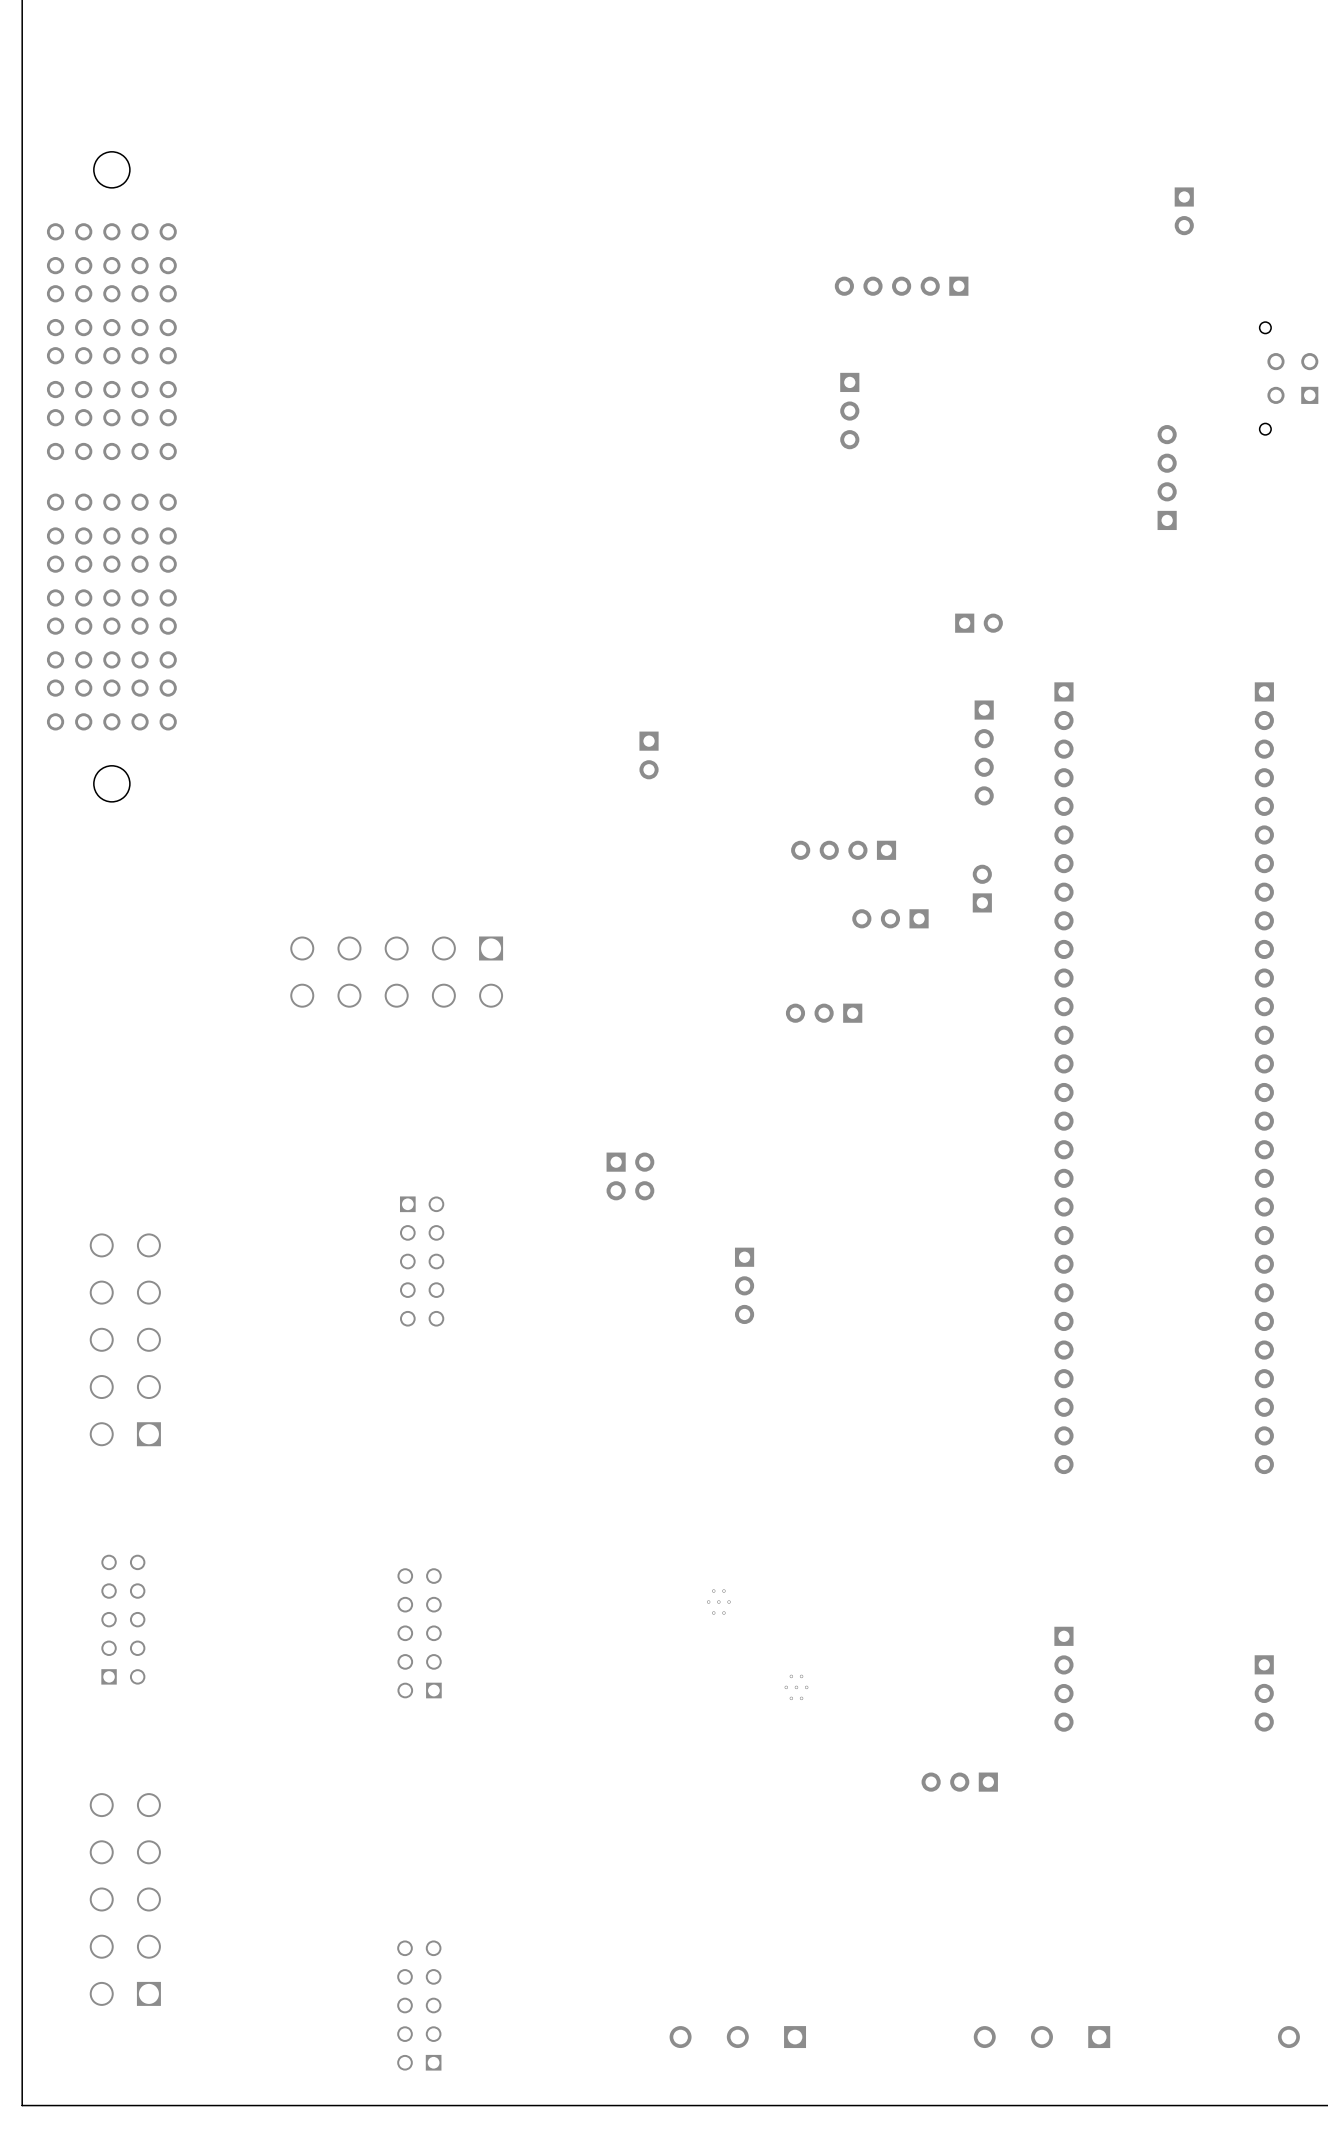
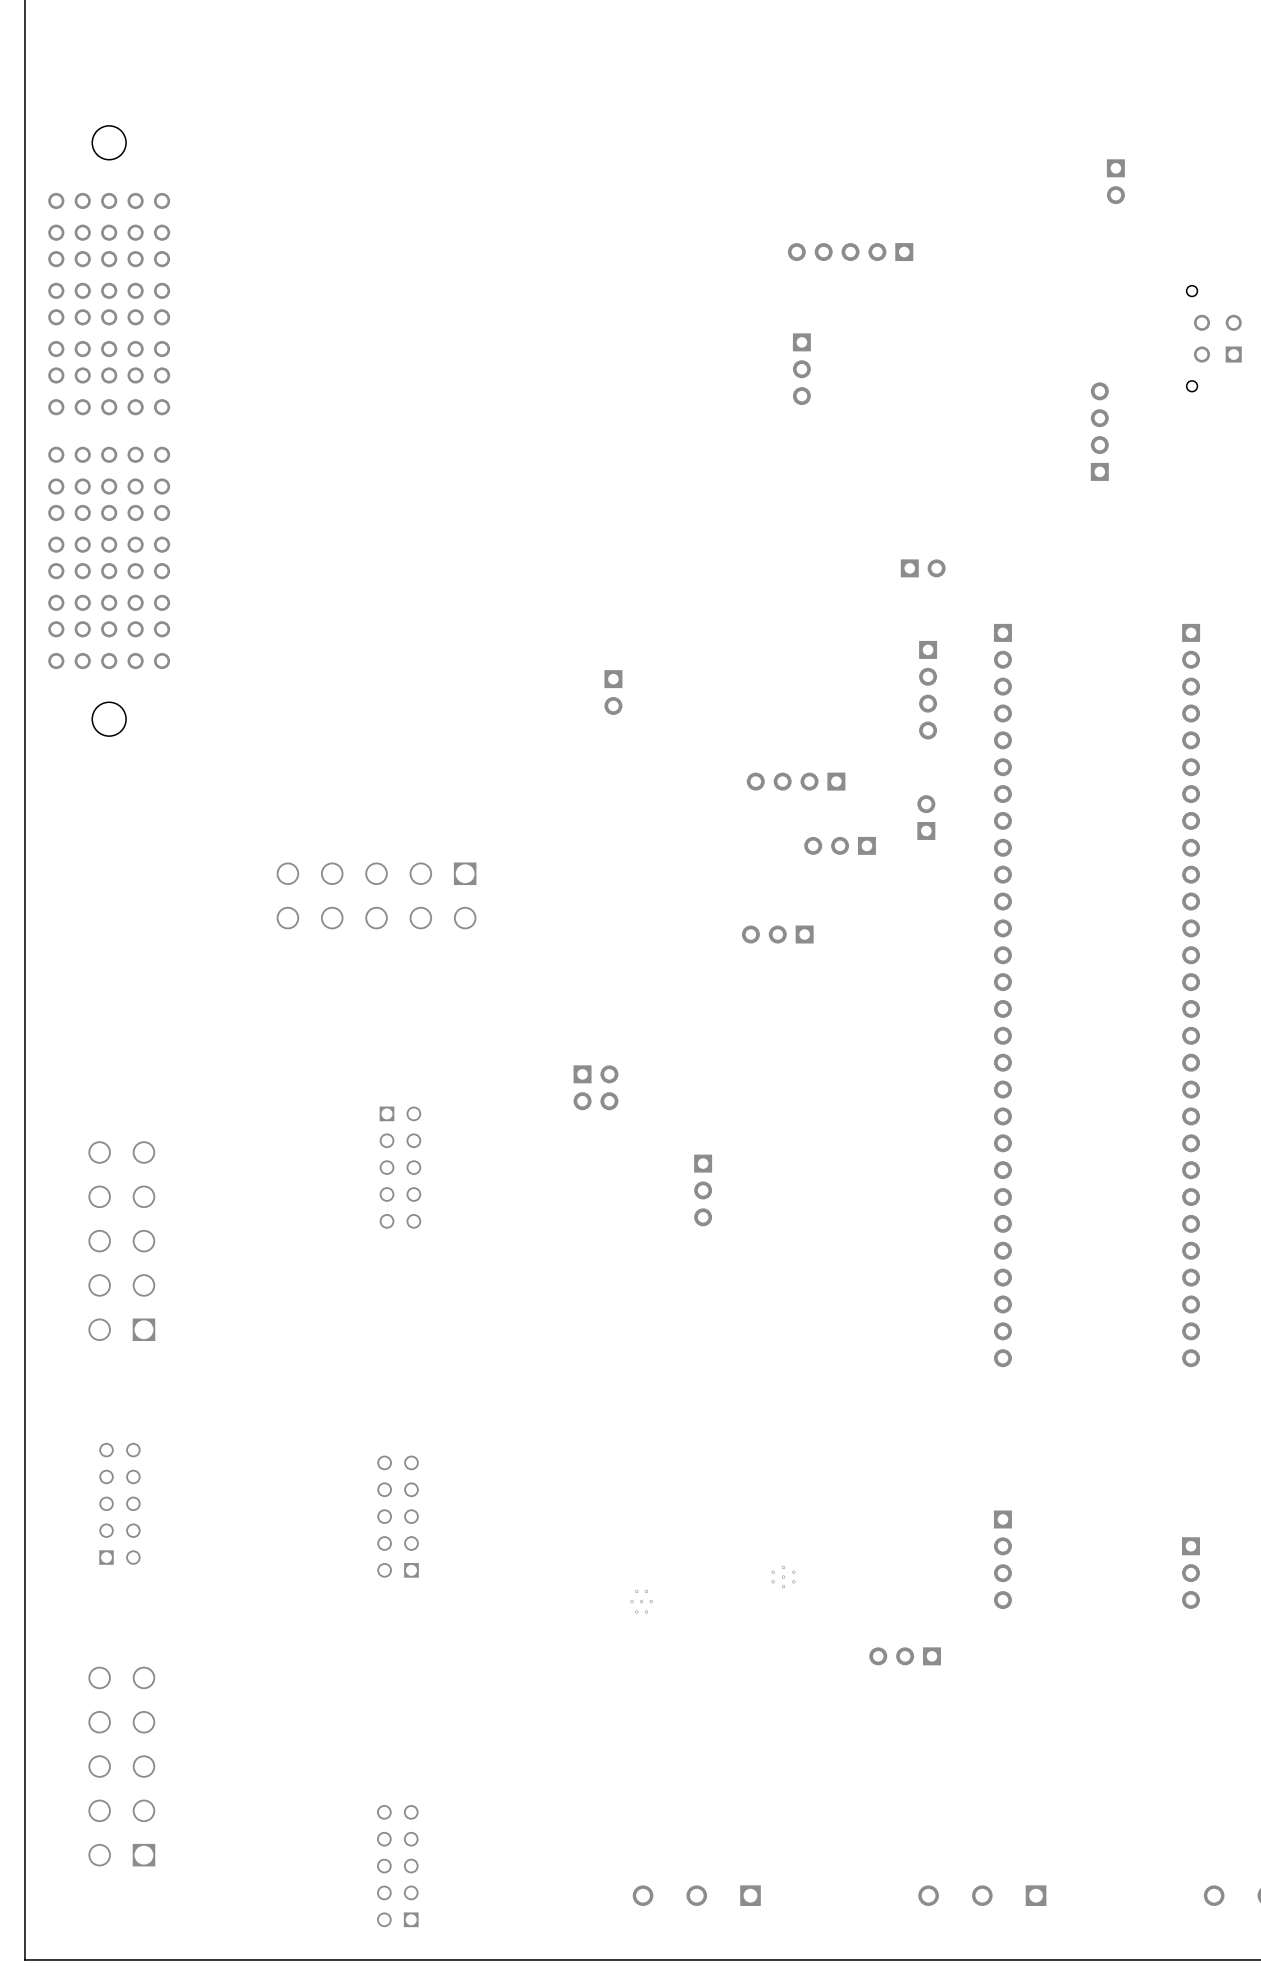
part: (718, 1602) -> none
part rotation: 0° (796, 1687) -> 90° clockwise (783, 1577)
part position: (796, 1687) -> (783, 1577)
part: none -> (641, 1601)

